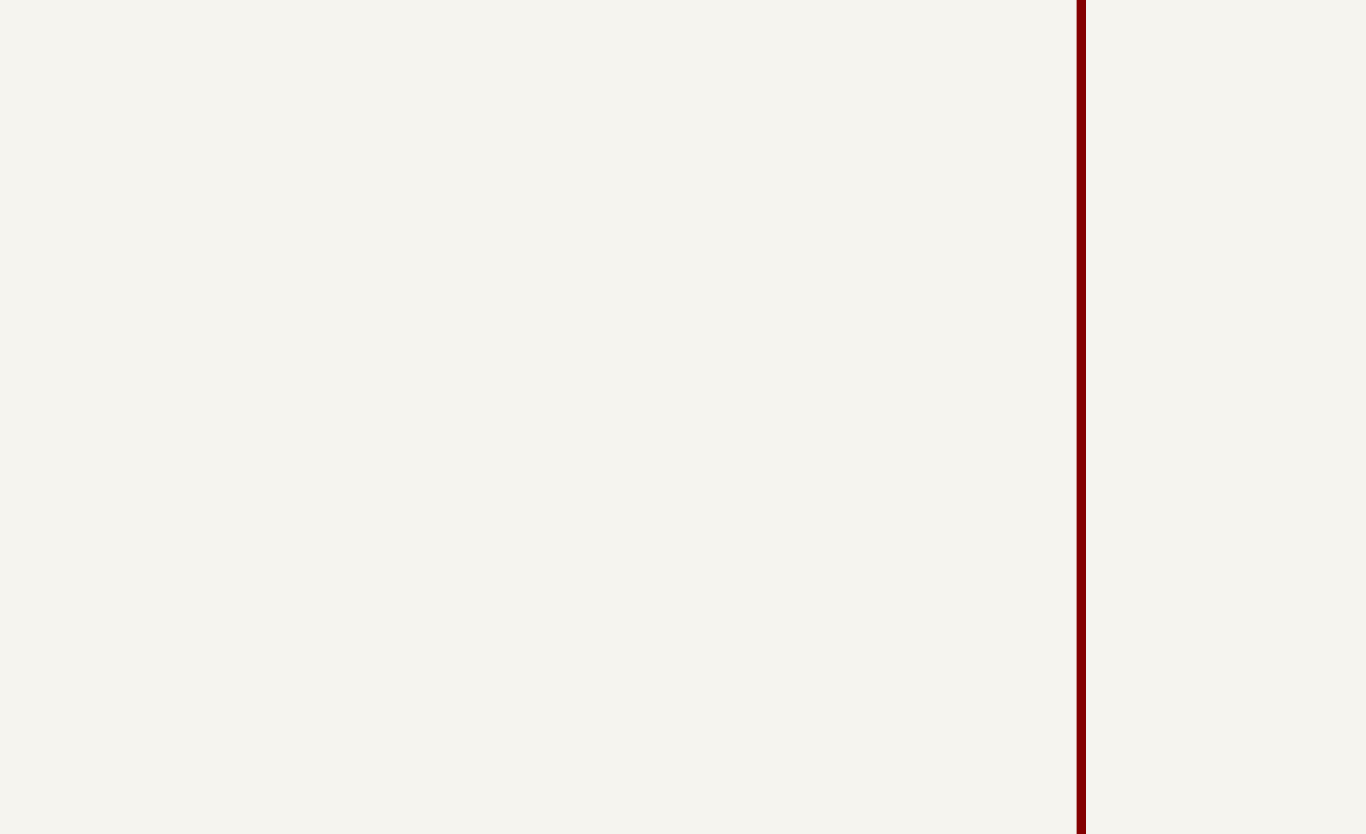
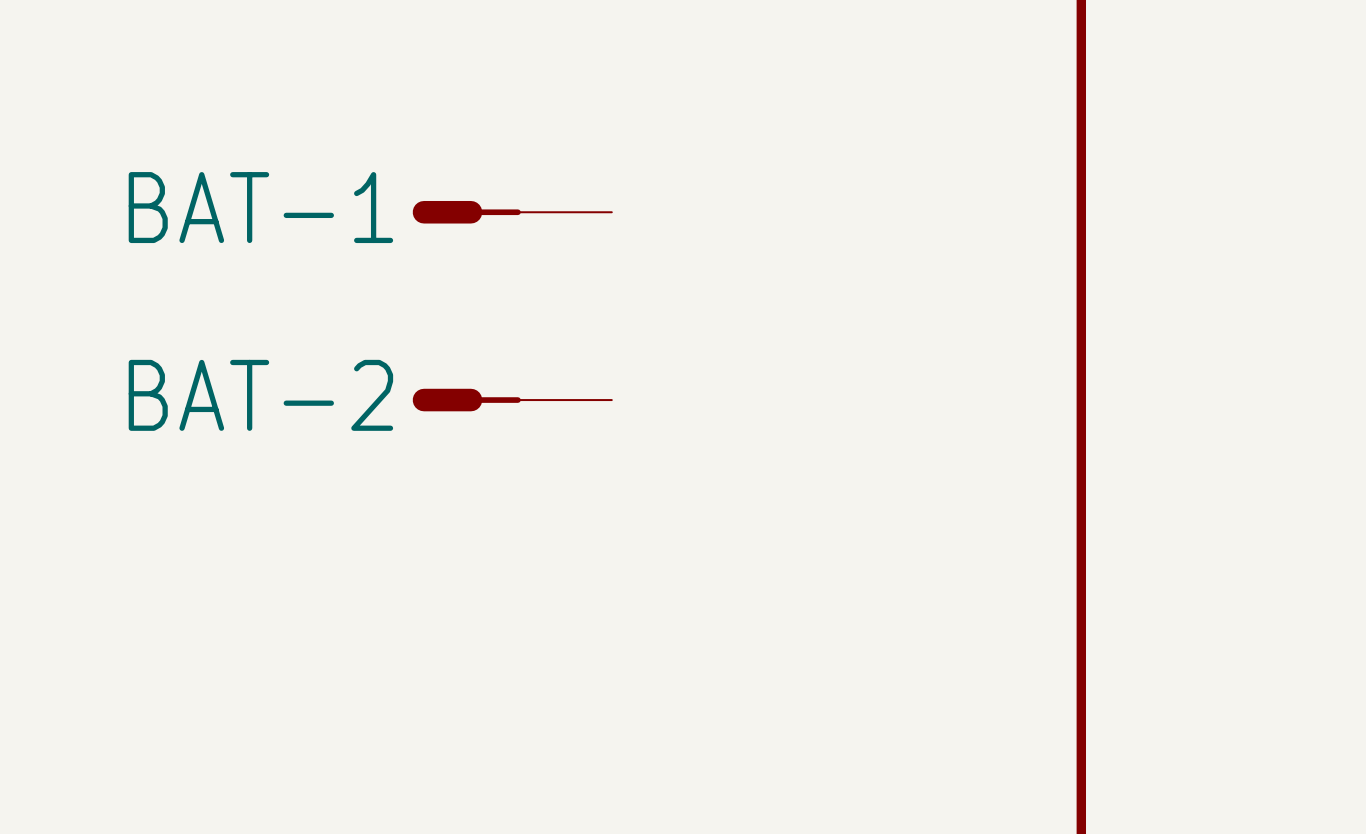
BAT-1: none -> (512, 212)
BAT-2: none -> (512, 400)

